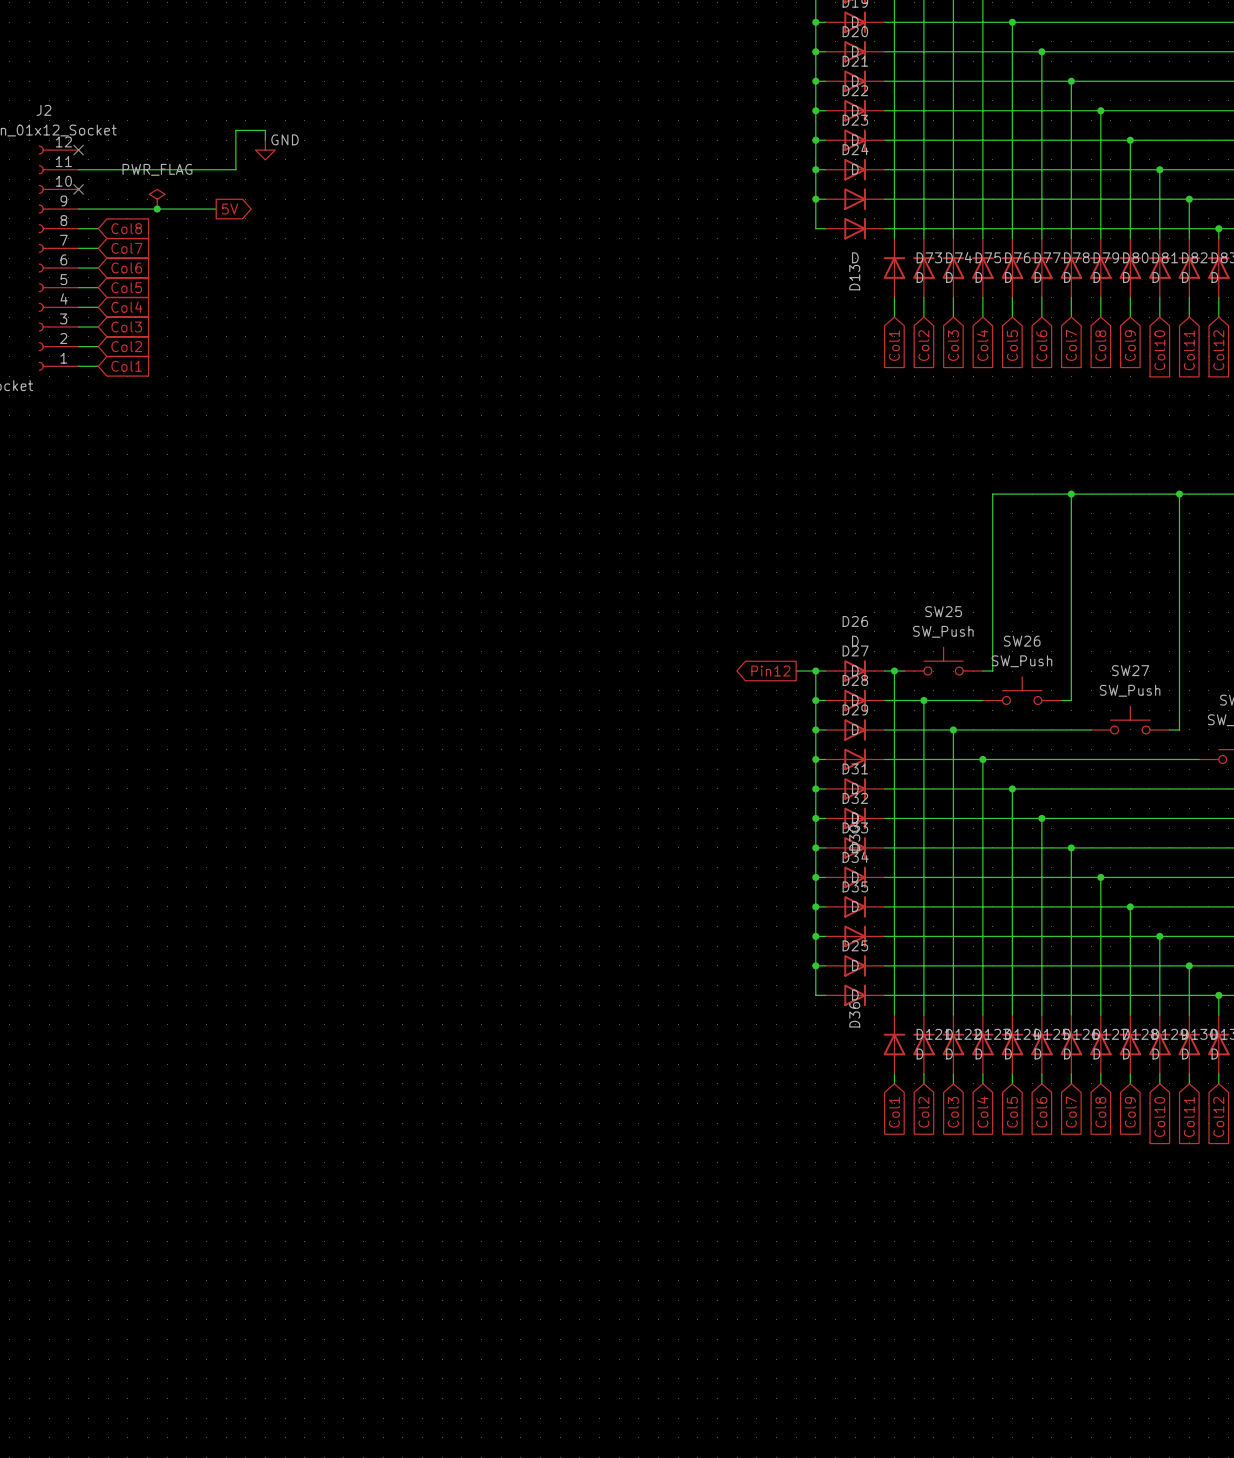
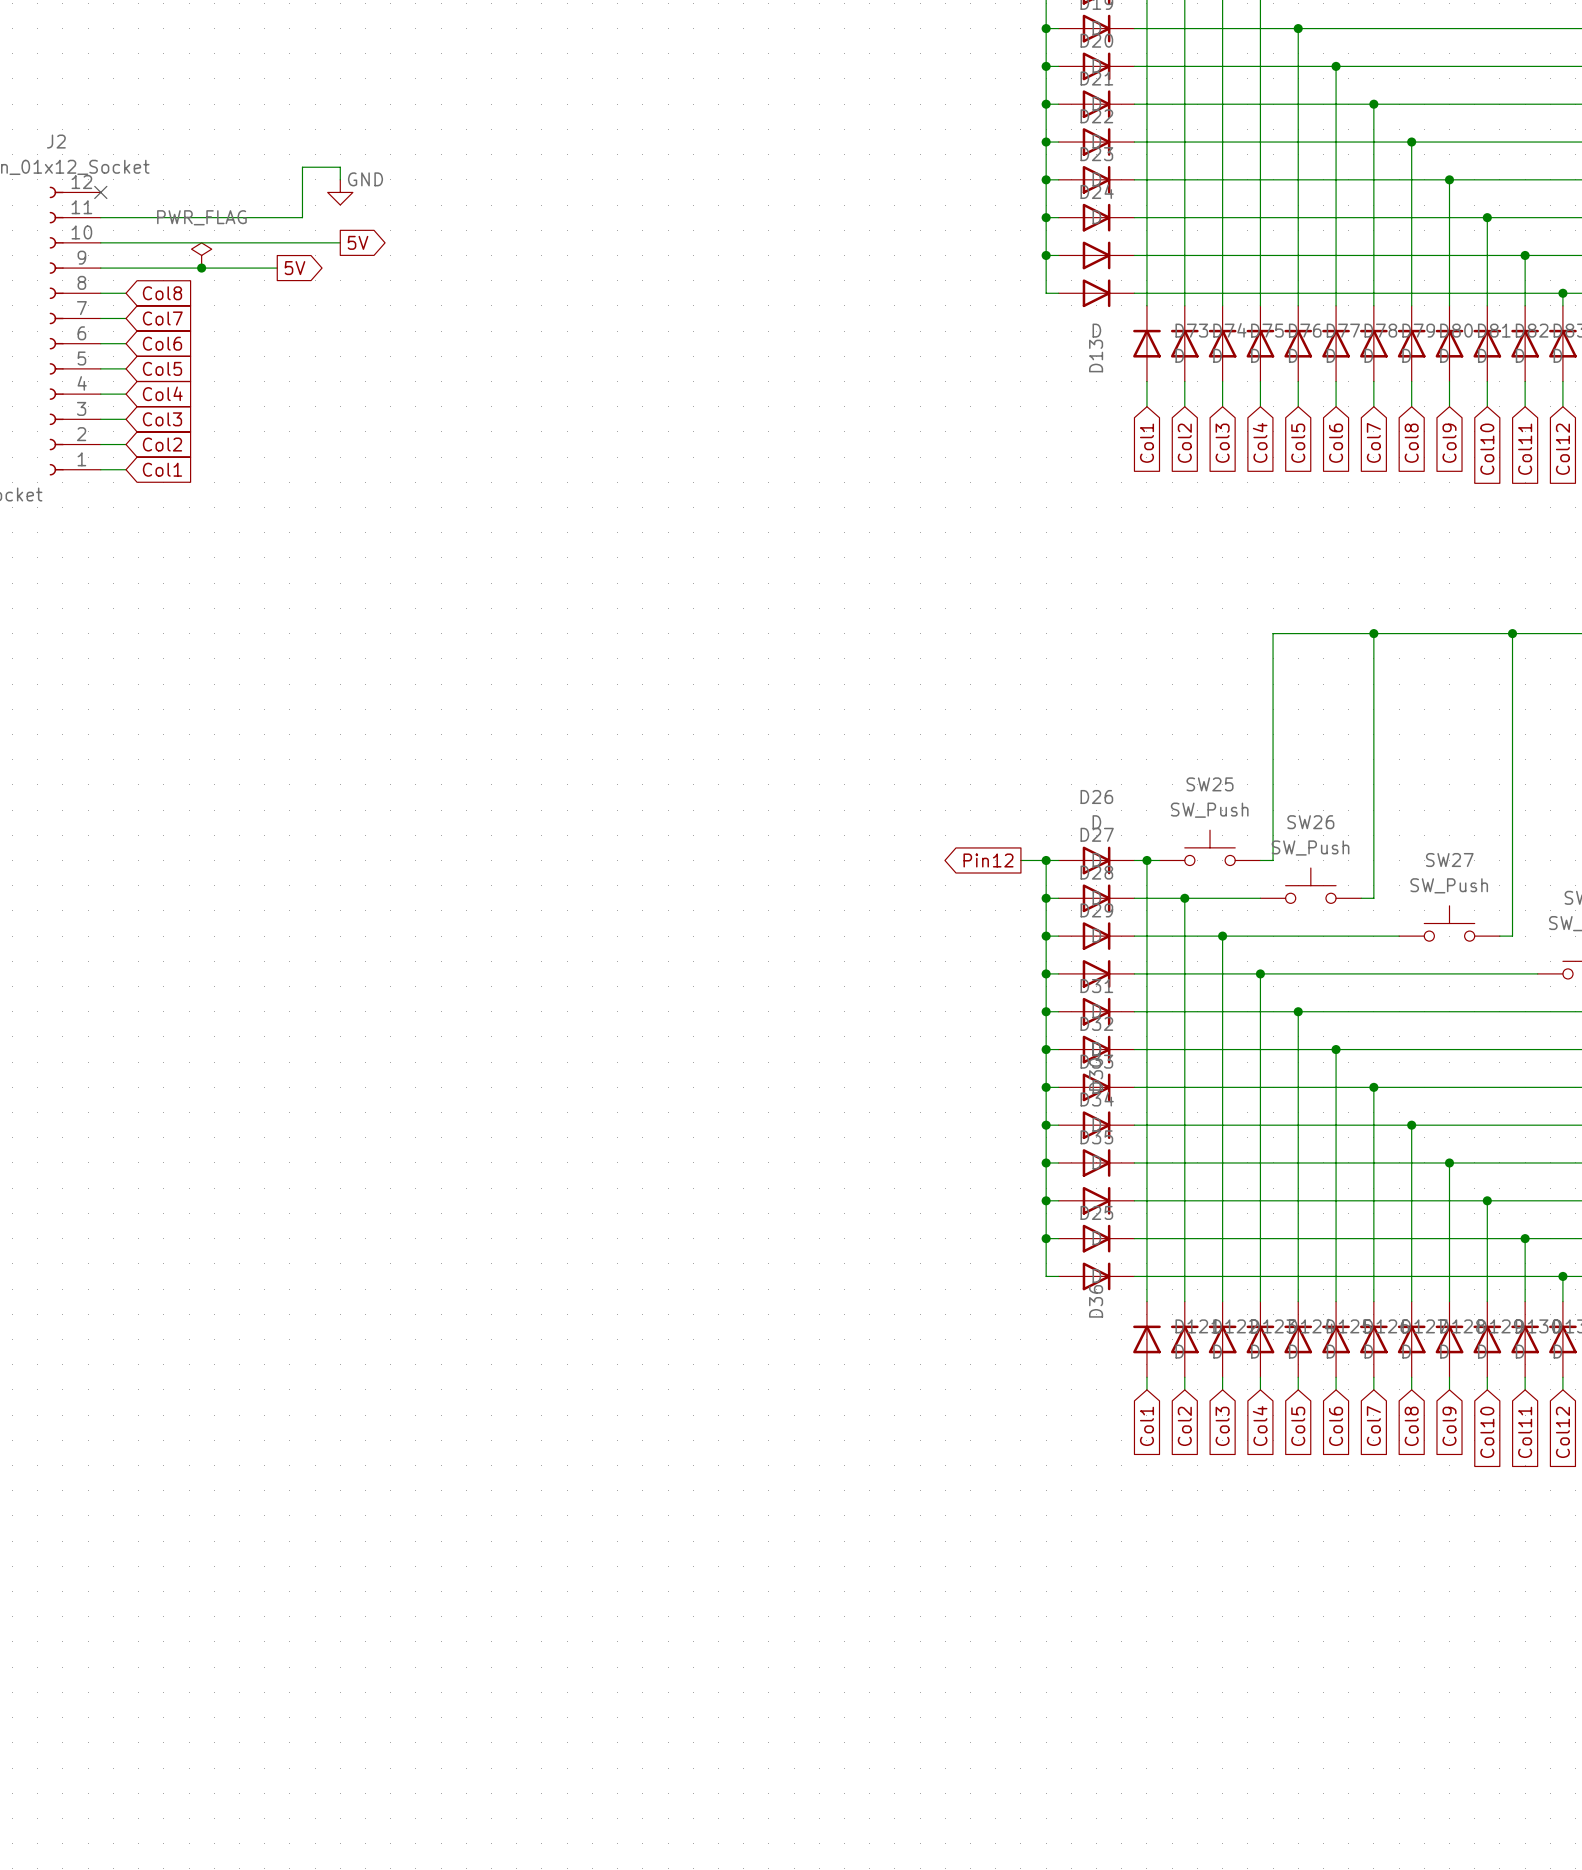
wire: none -> (100, 242) (340, 242)
no-connect mark: (78, 189) -> none
global label: none -> 5V (358, 242)

